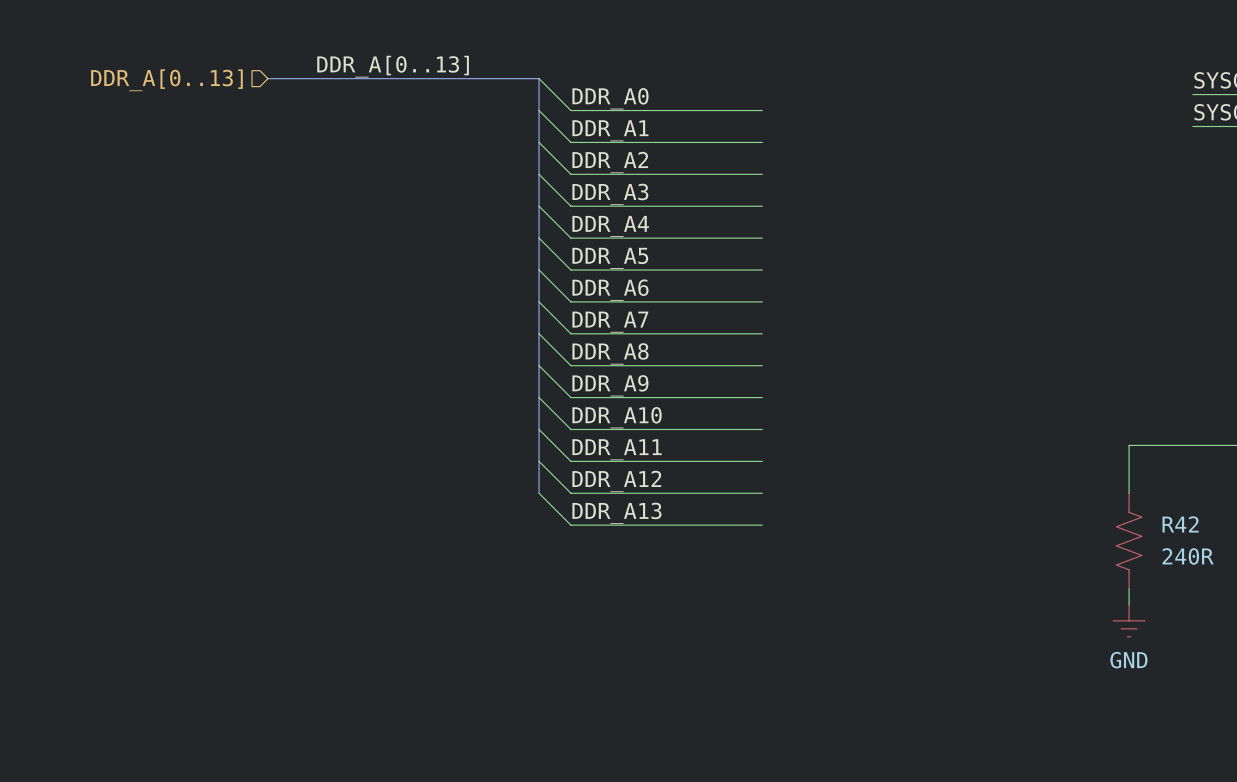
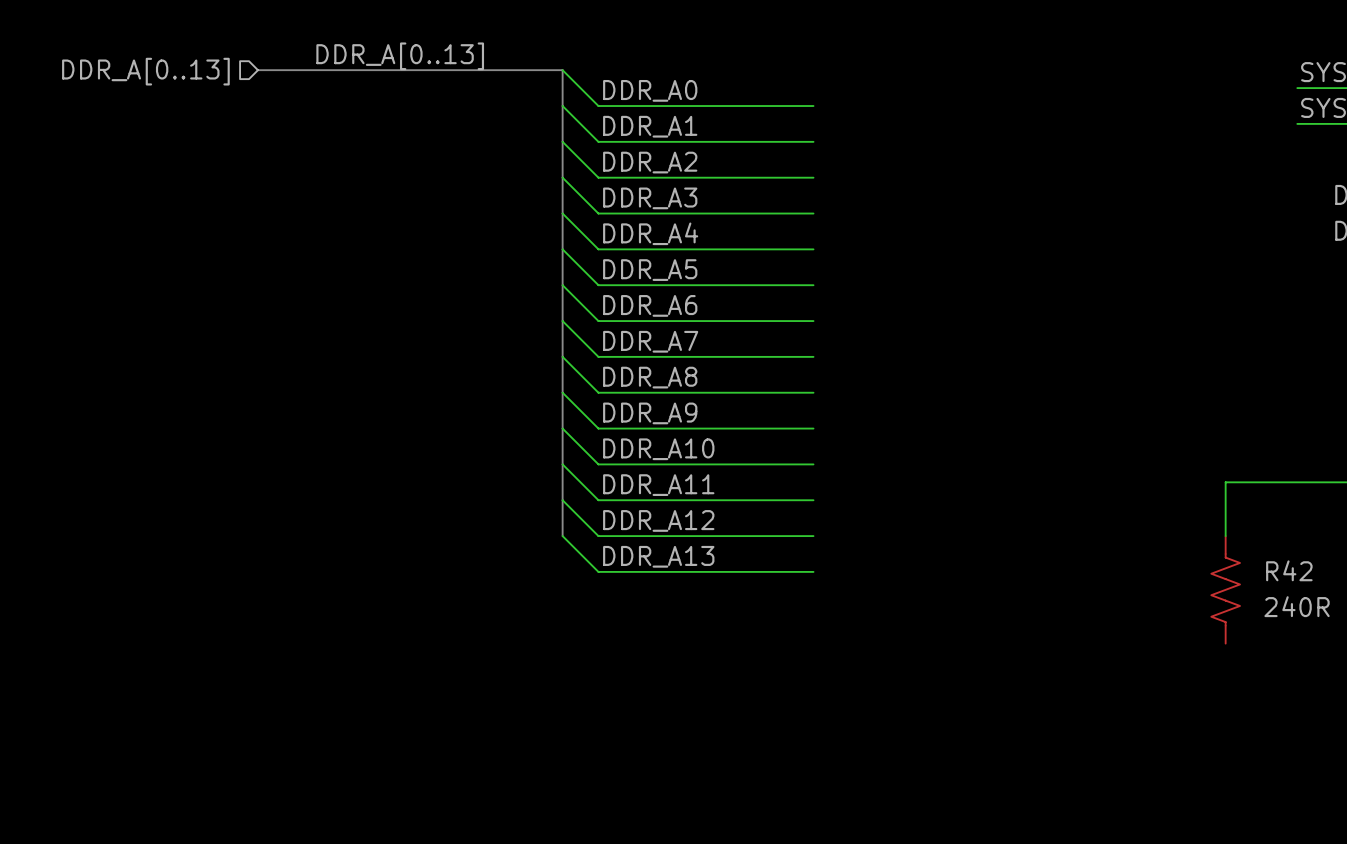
wire: (1129, 588) (1129, 604) -> none
power symbol: GND (1129, 620) -> none

